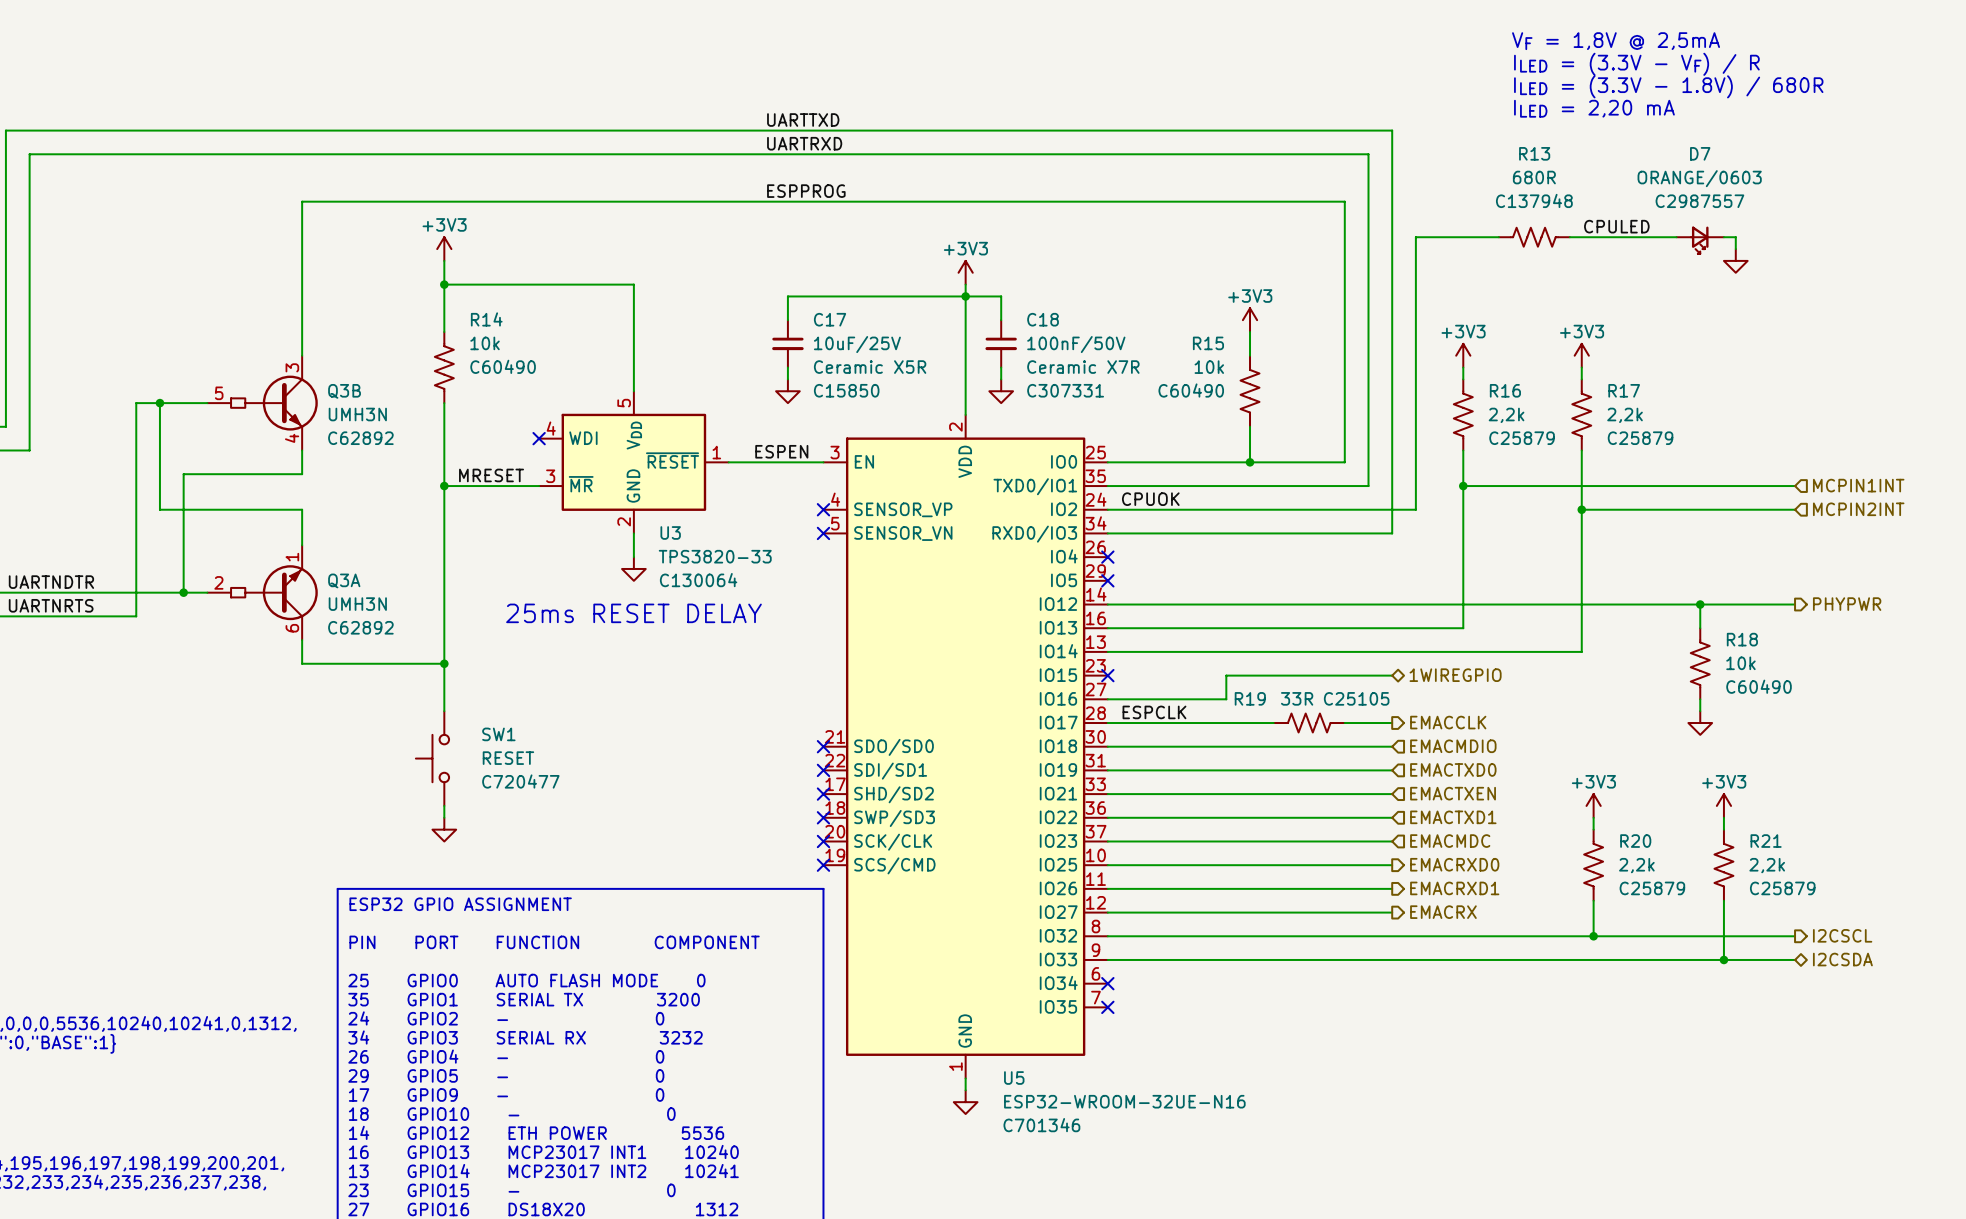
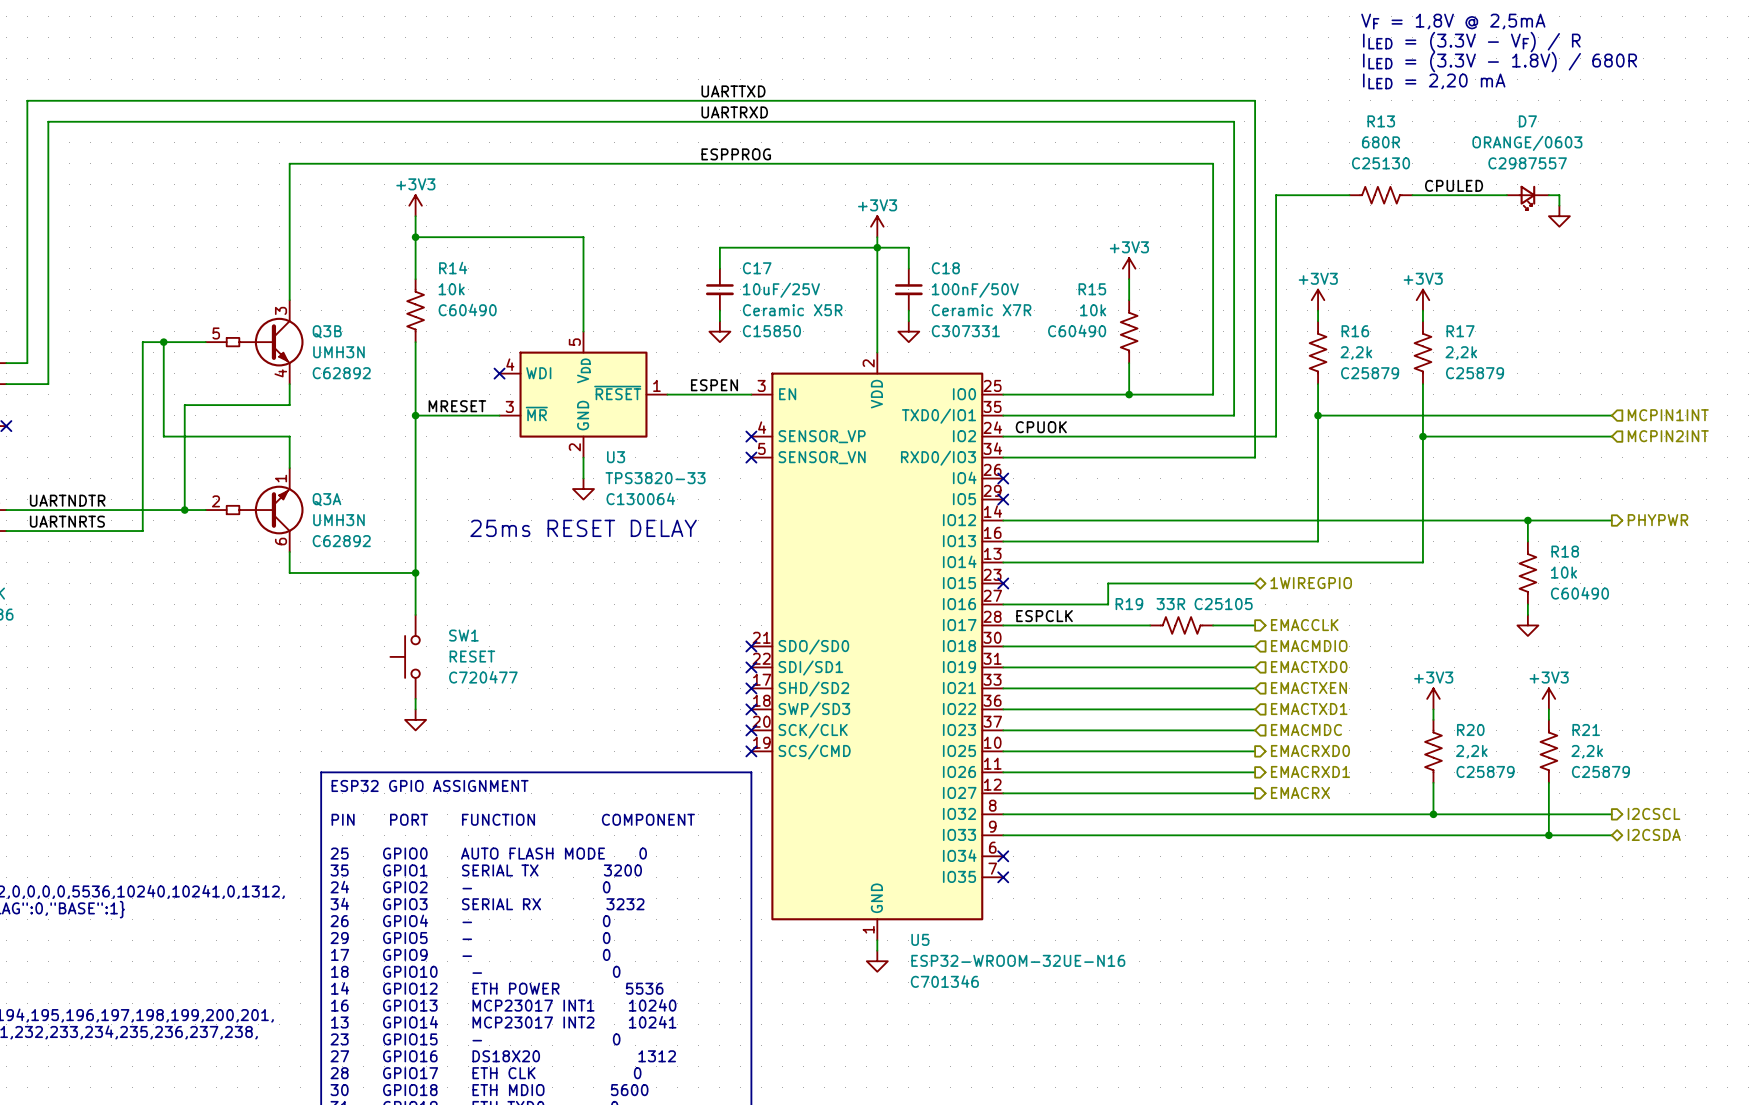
R13 text: C137948 (1534, 200) -> C25130 (1381, 163)

